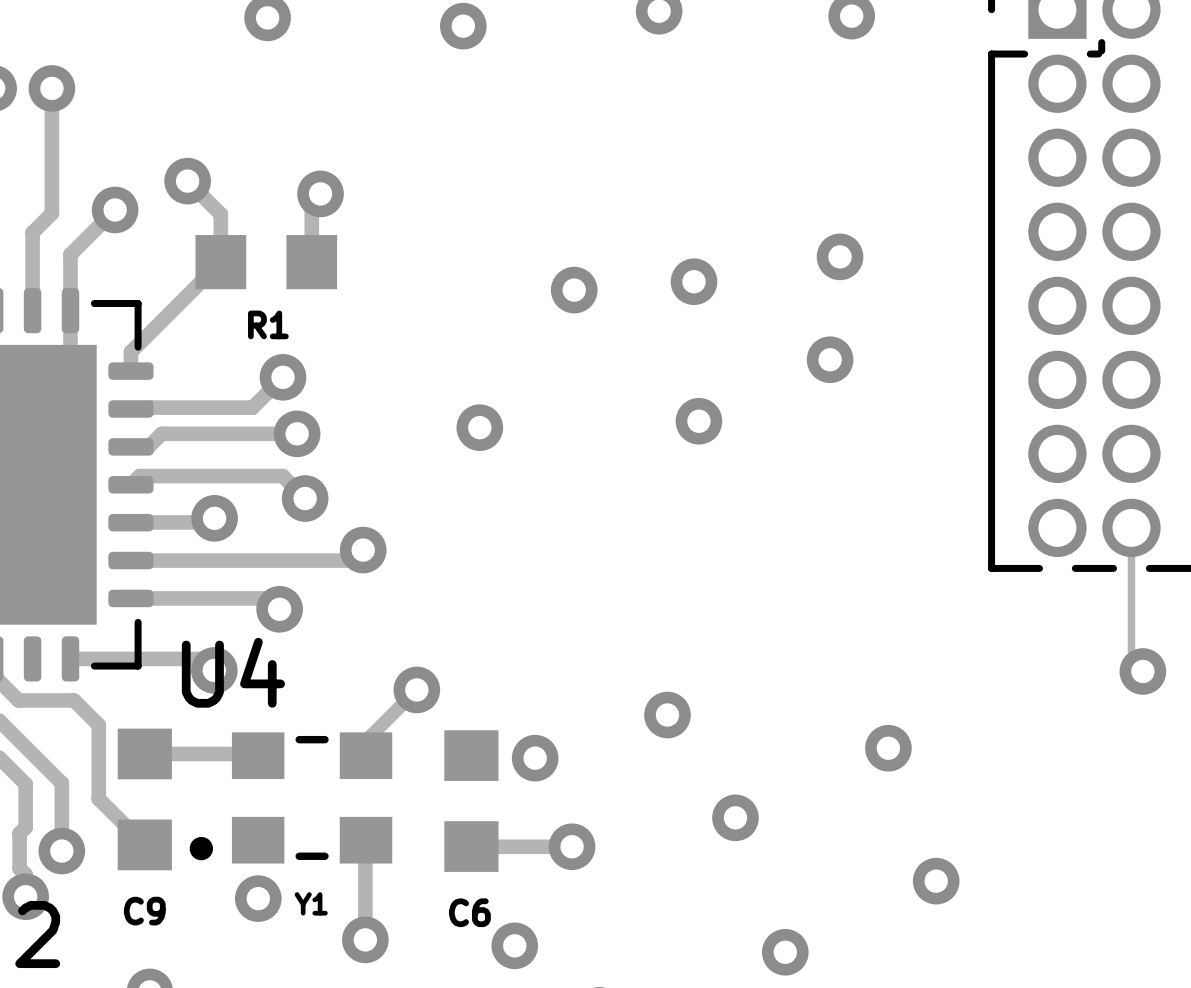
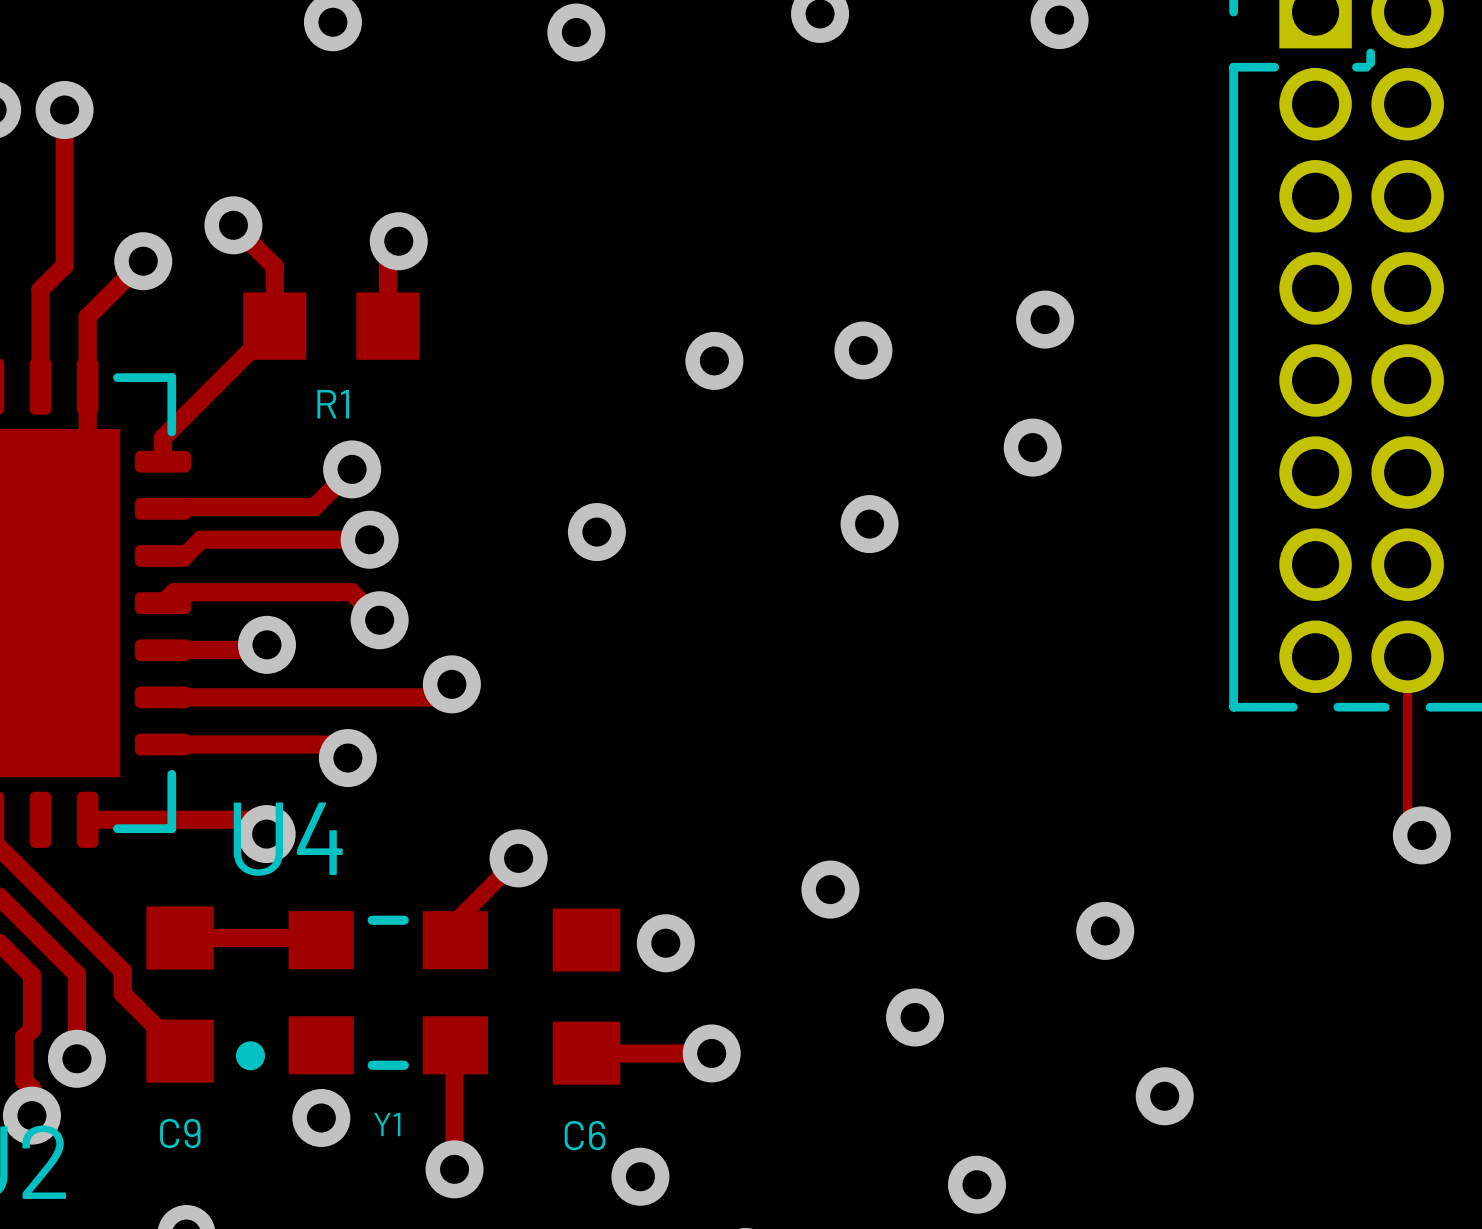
track: (18, 700) (74, 700) (98, 725) (98, 780) -> (23, 871) (122, 971)

